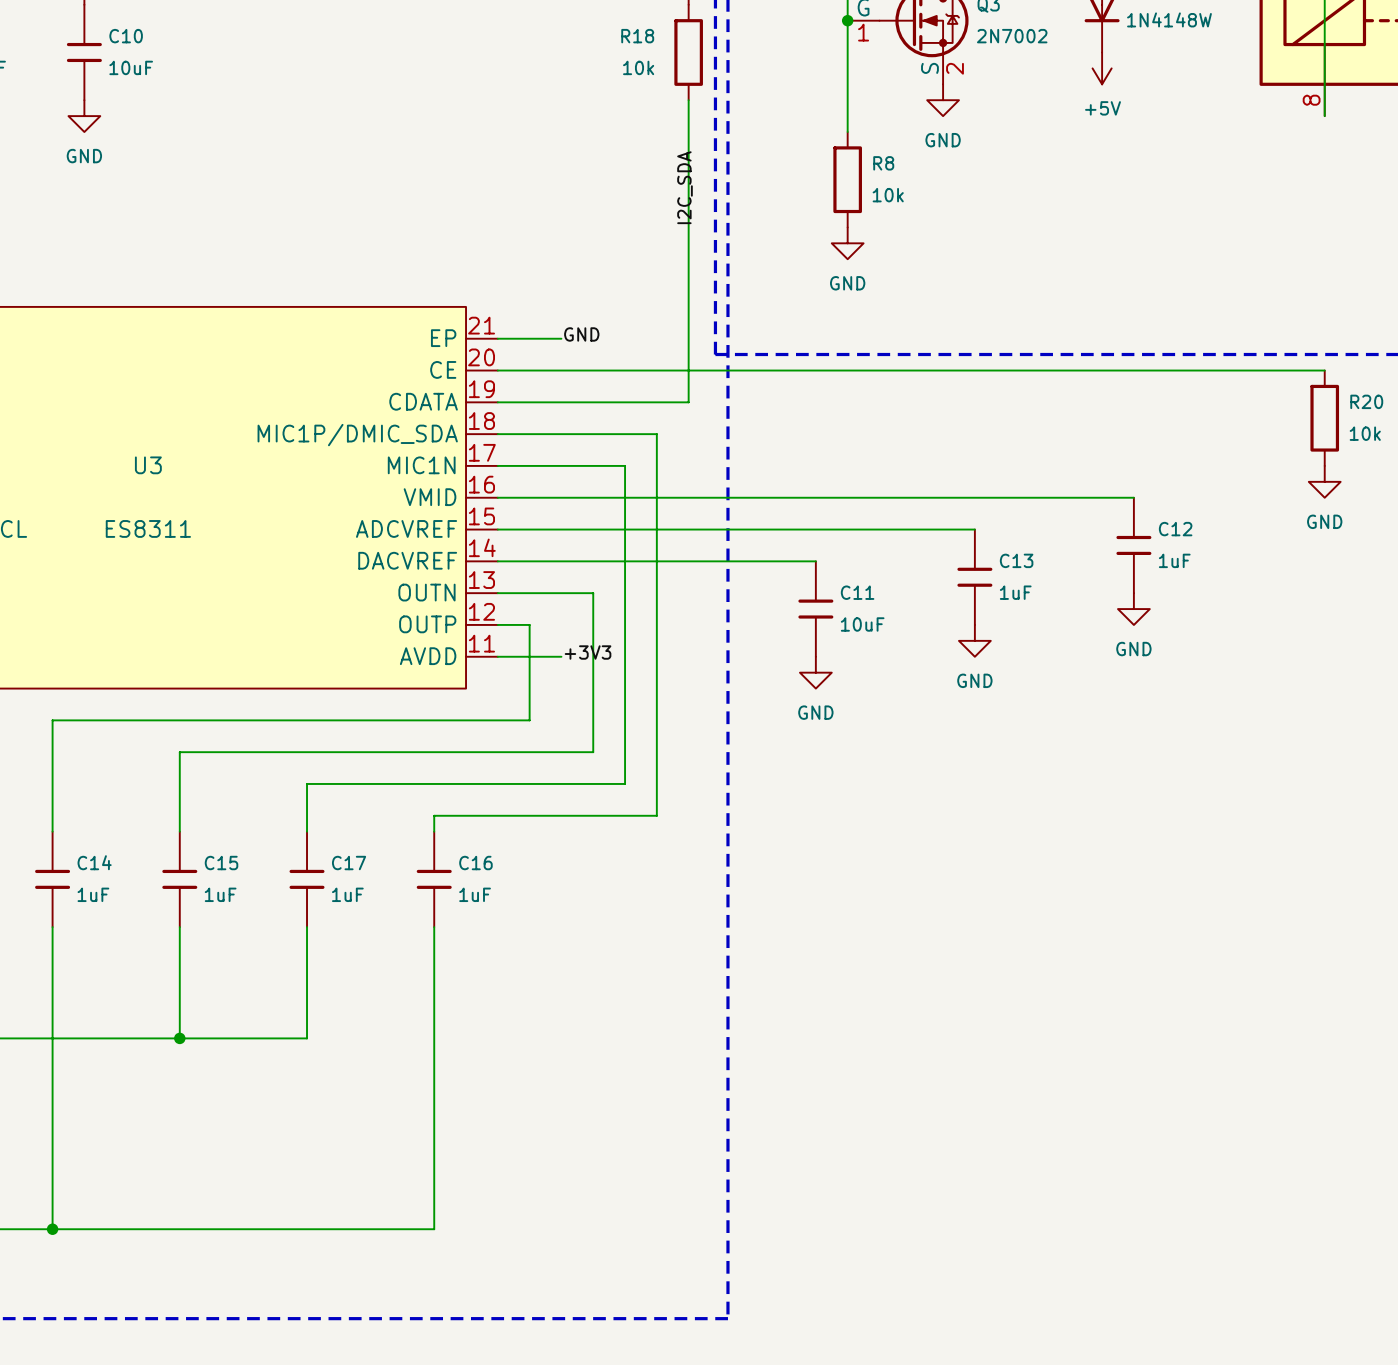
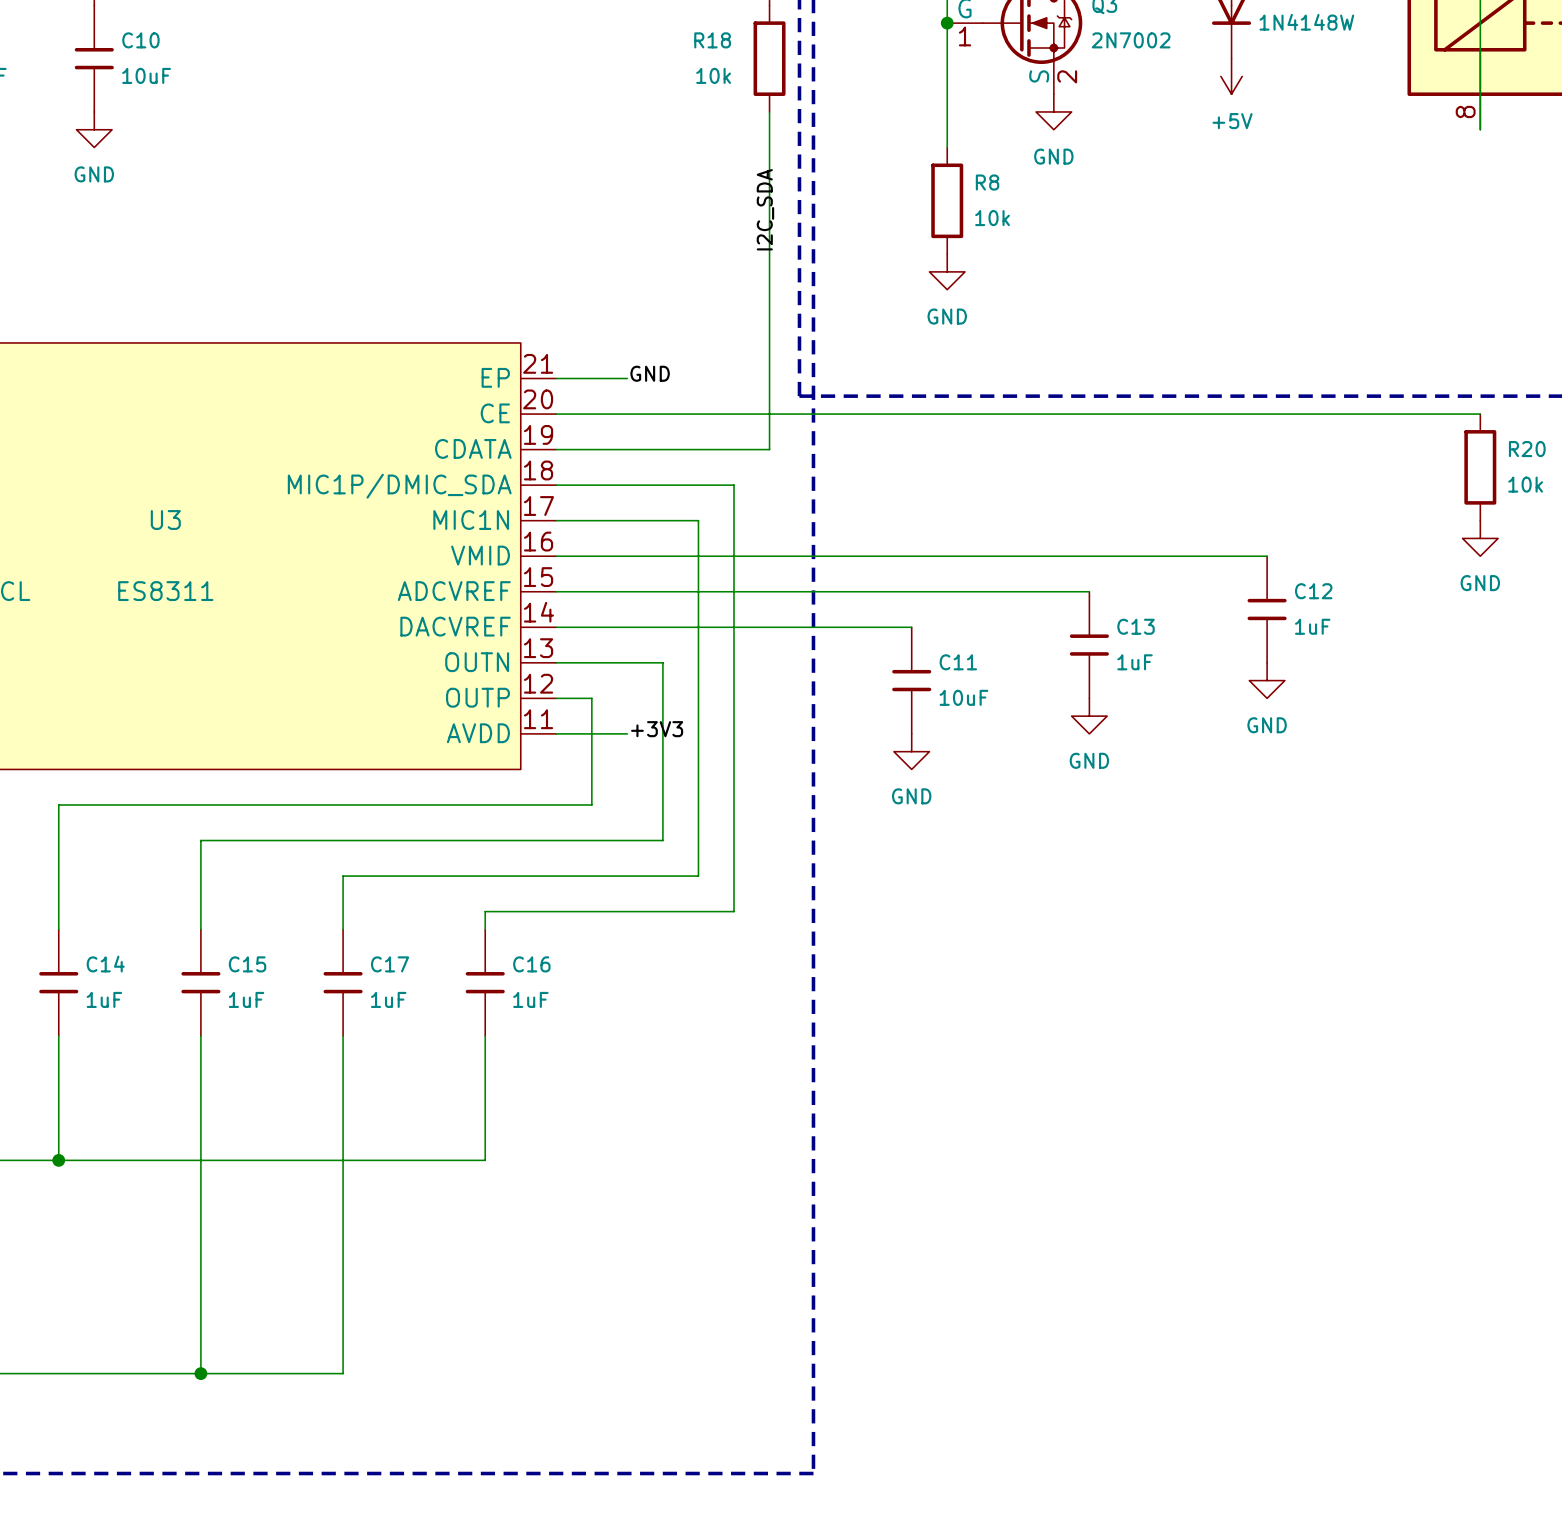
wire: (52, 1038) (52, 1229) -> (200, 1160) (200, 1373)
junction: none -> (58, 1160)
junction: (179, 1038) -> none
wire: (434, 1038) (434, 1229) (307, 1229) -> (485, 1160) (343, 1160) (343, 1373)
junction: (52, 1229) -> none
junction: none -> (200, 1373)

